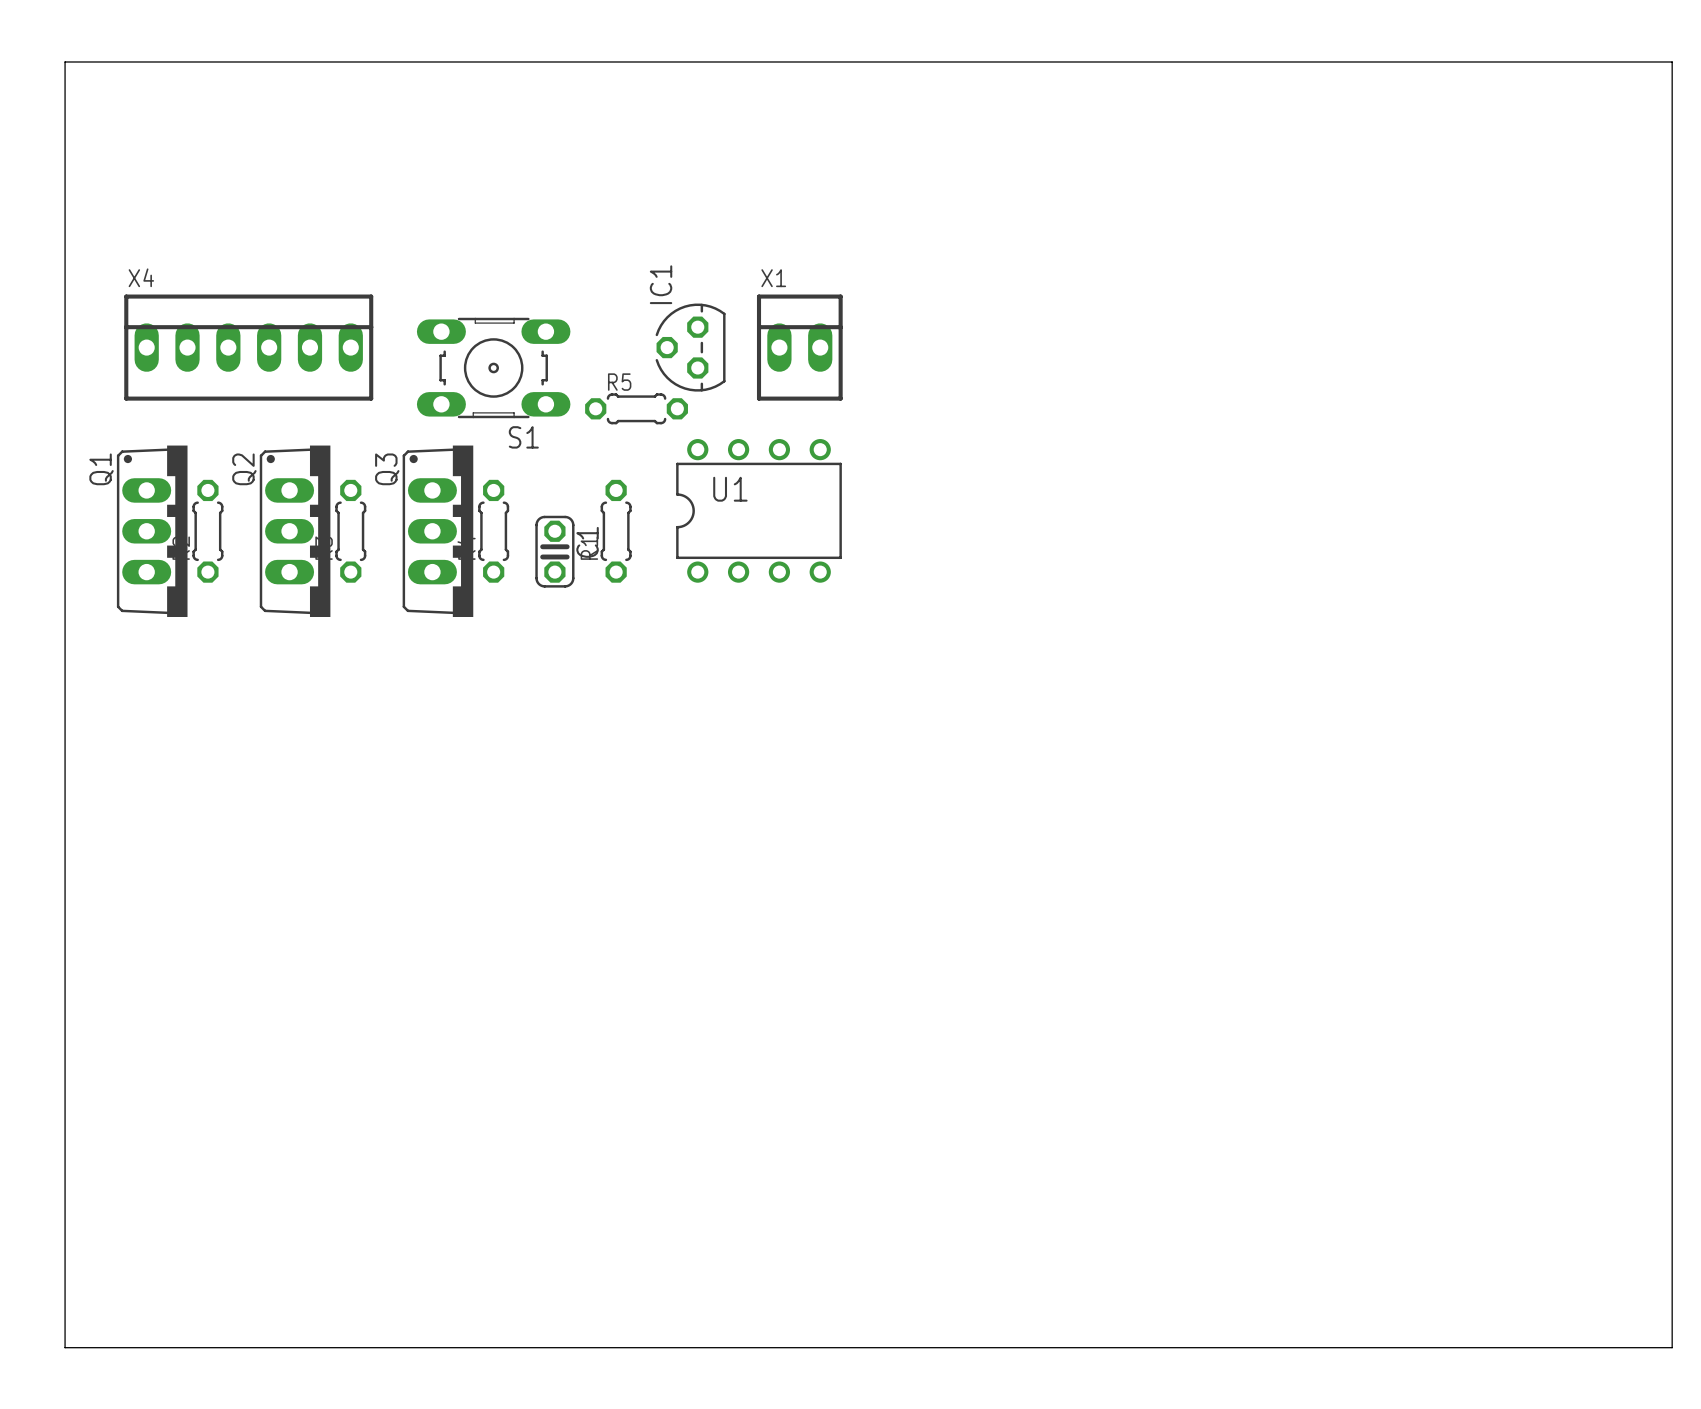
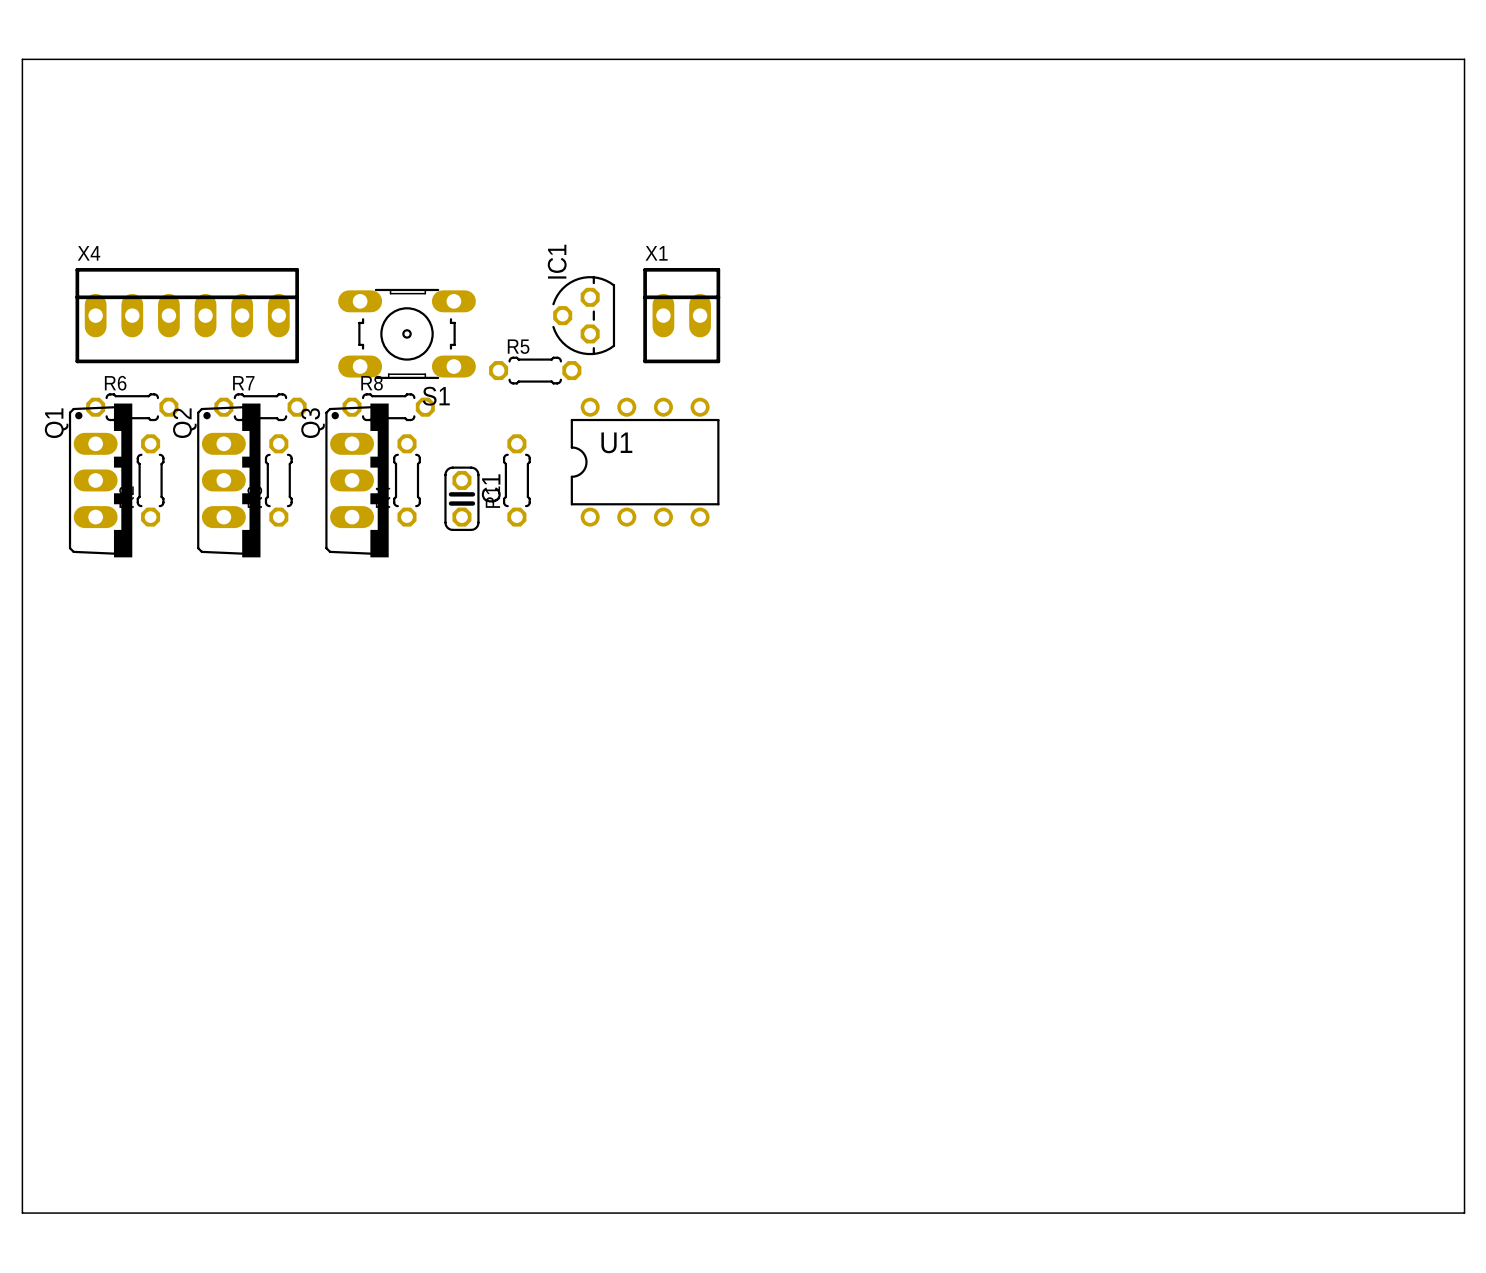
R6: none -> (132, 407)
R7: none -> (260, 407)
R8: none -> (388, 407)

